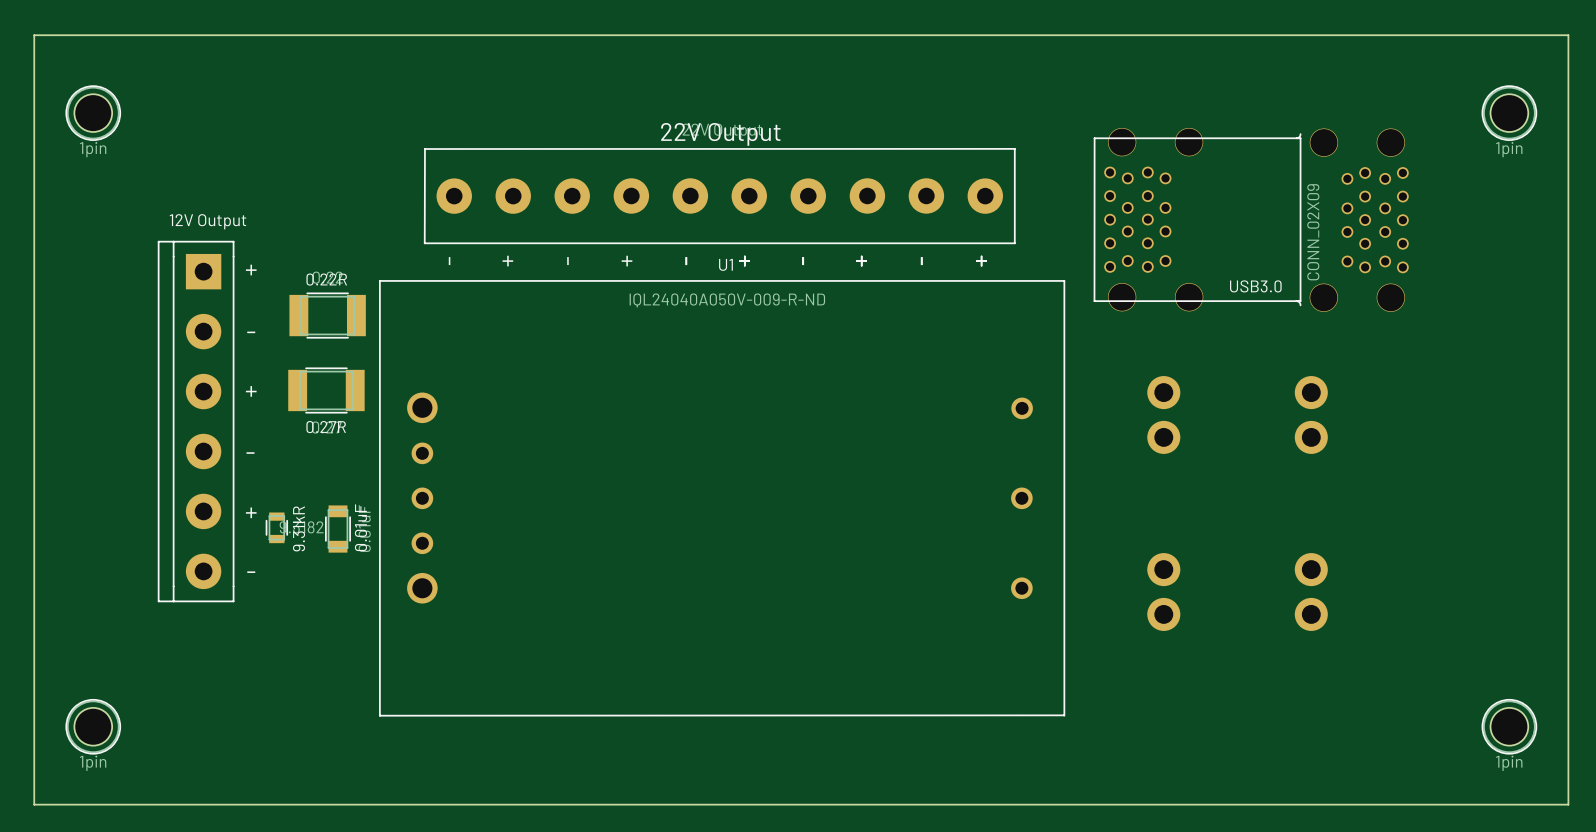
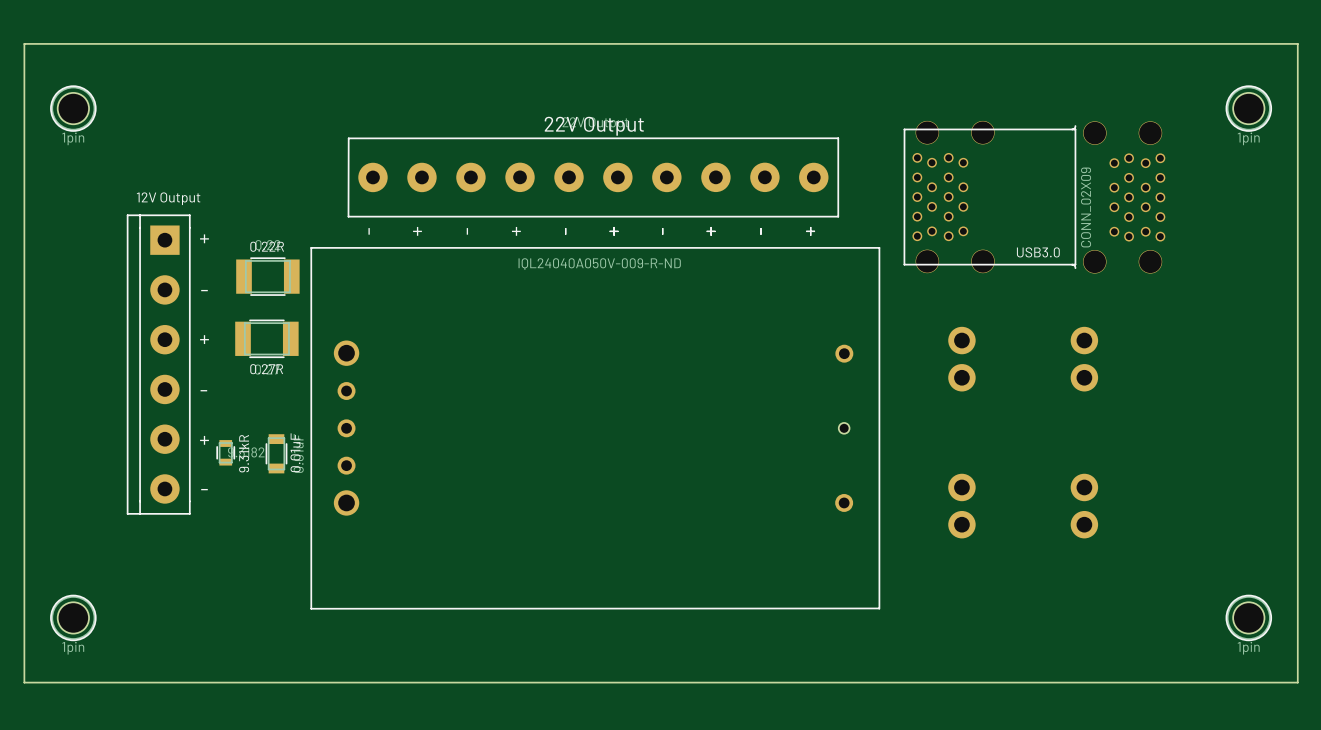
U1: IQL24040A050V-009-R-ND (722, 498) -> none
part: none -> IQL24040A050V-009-R-ND (595, 428)

